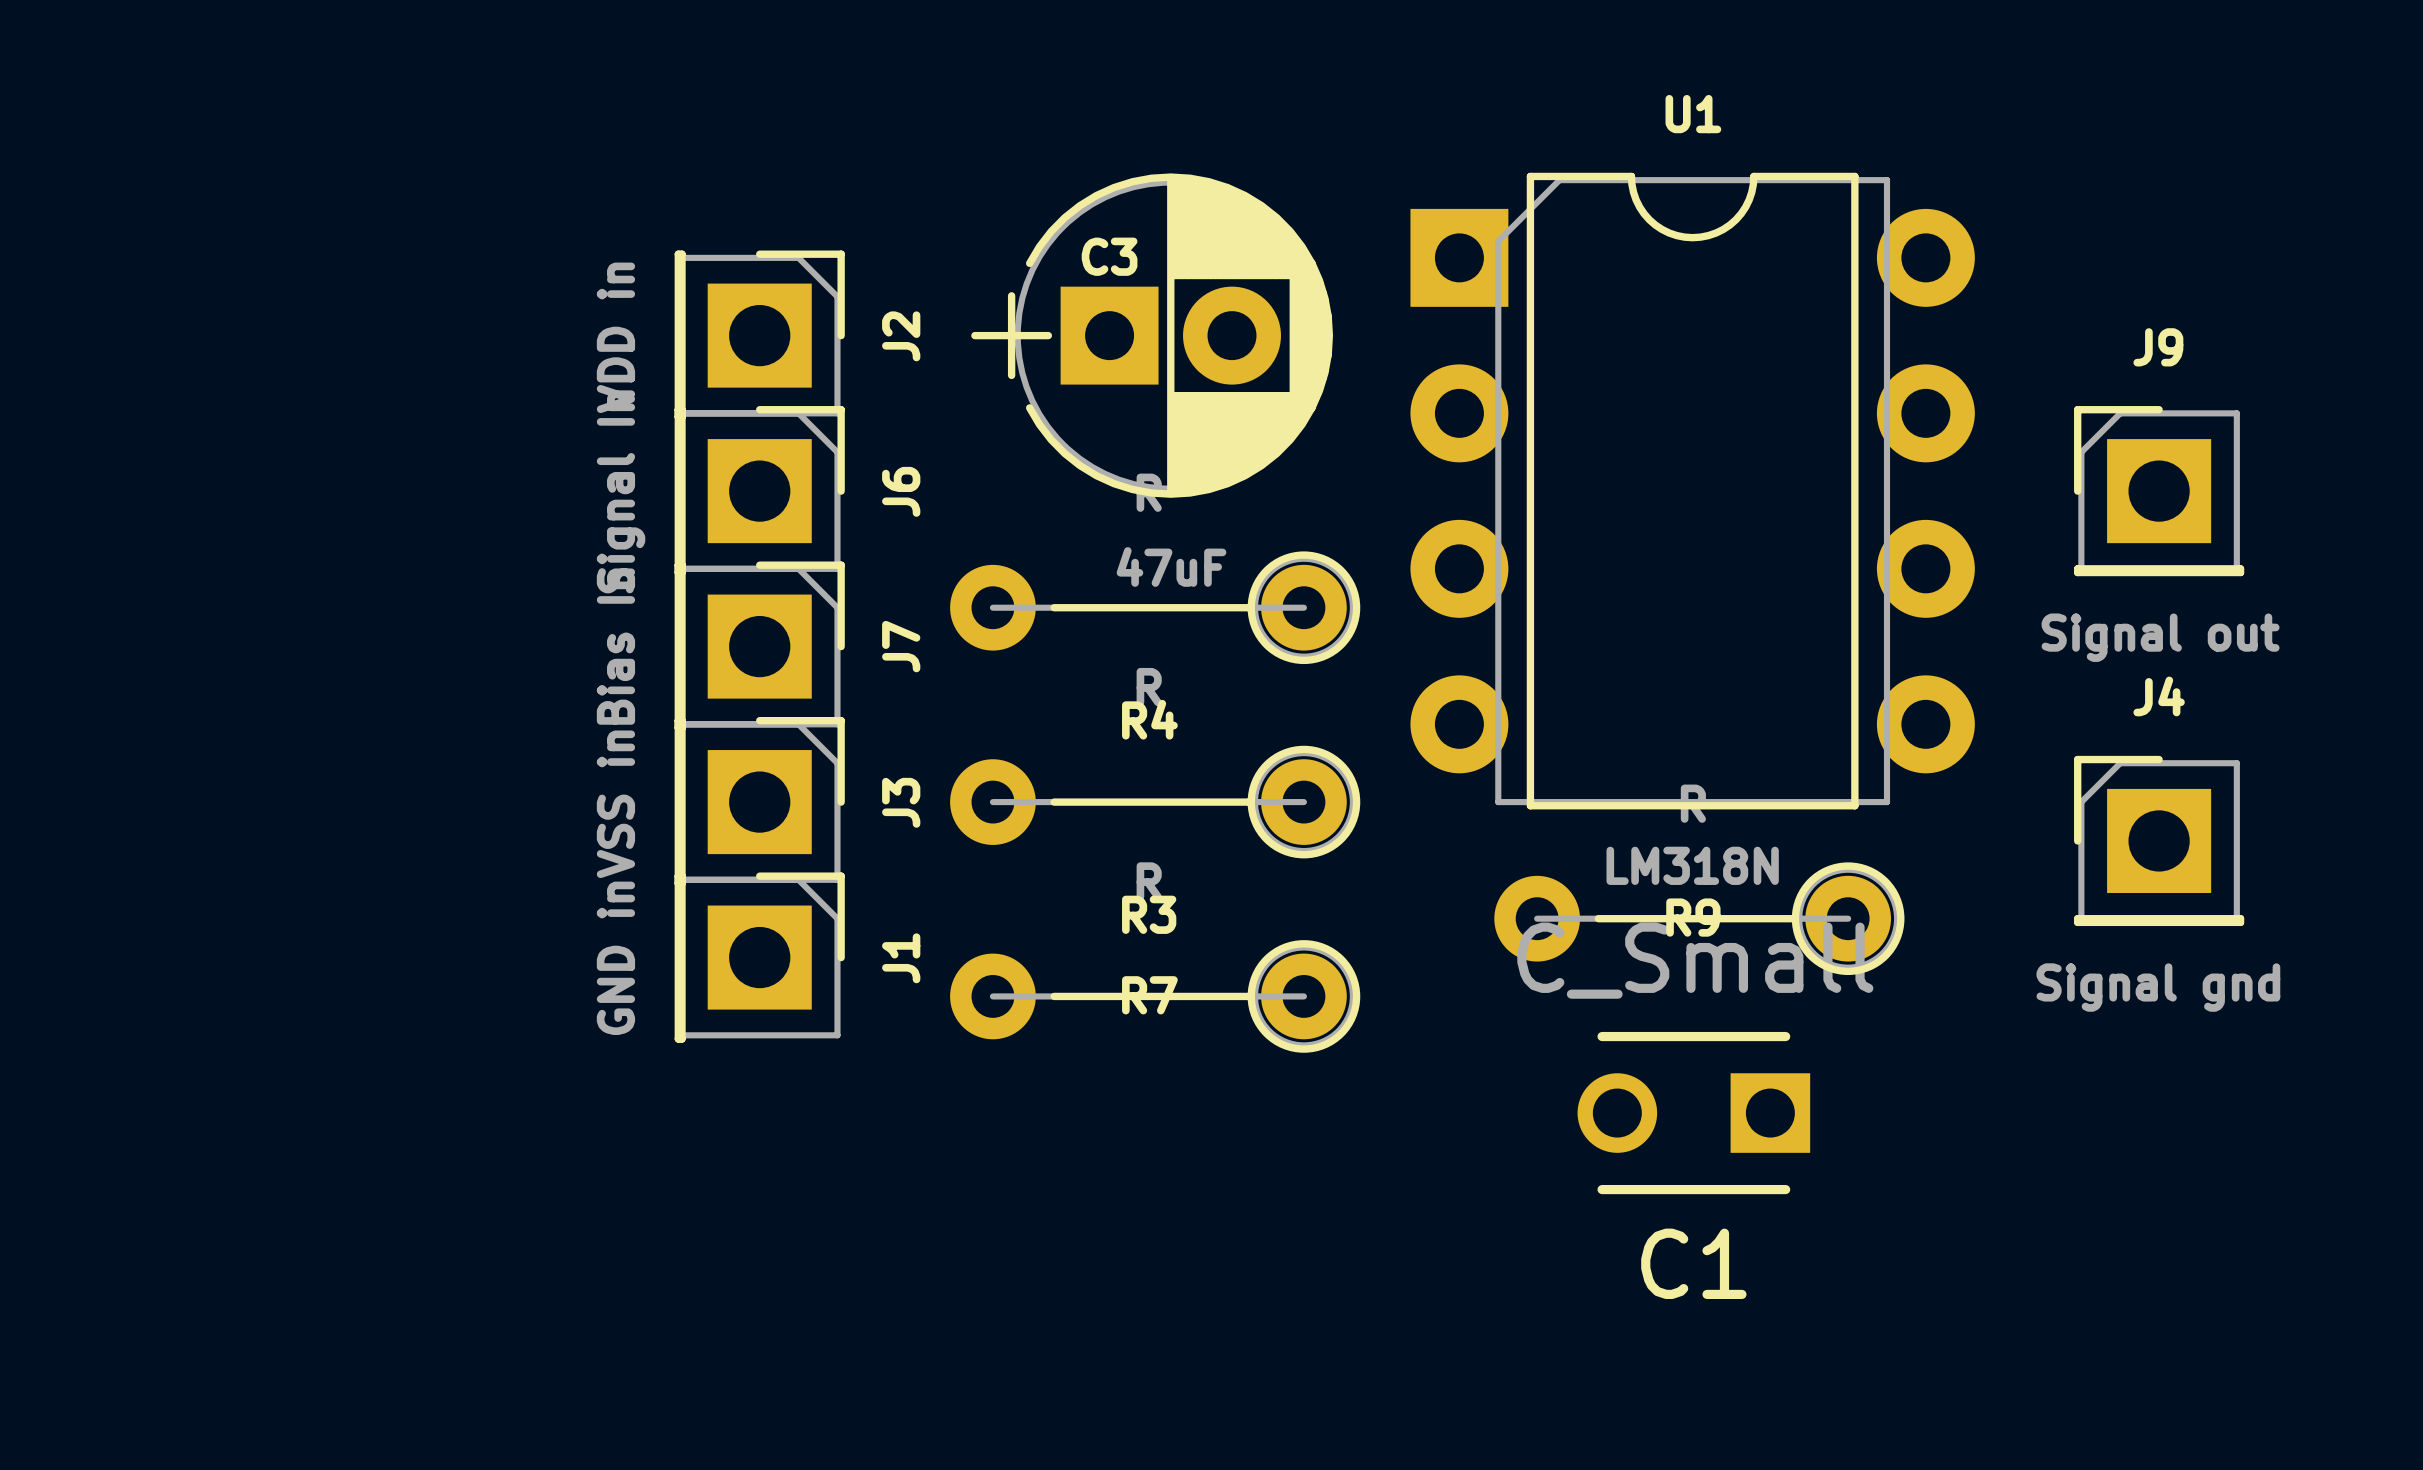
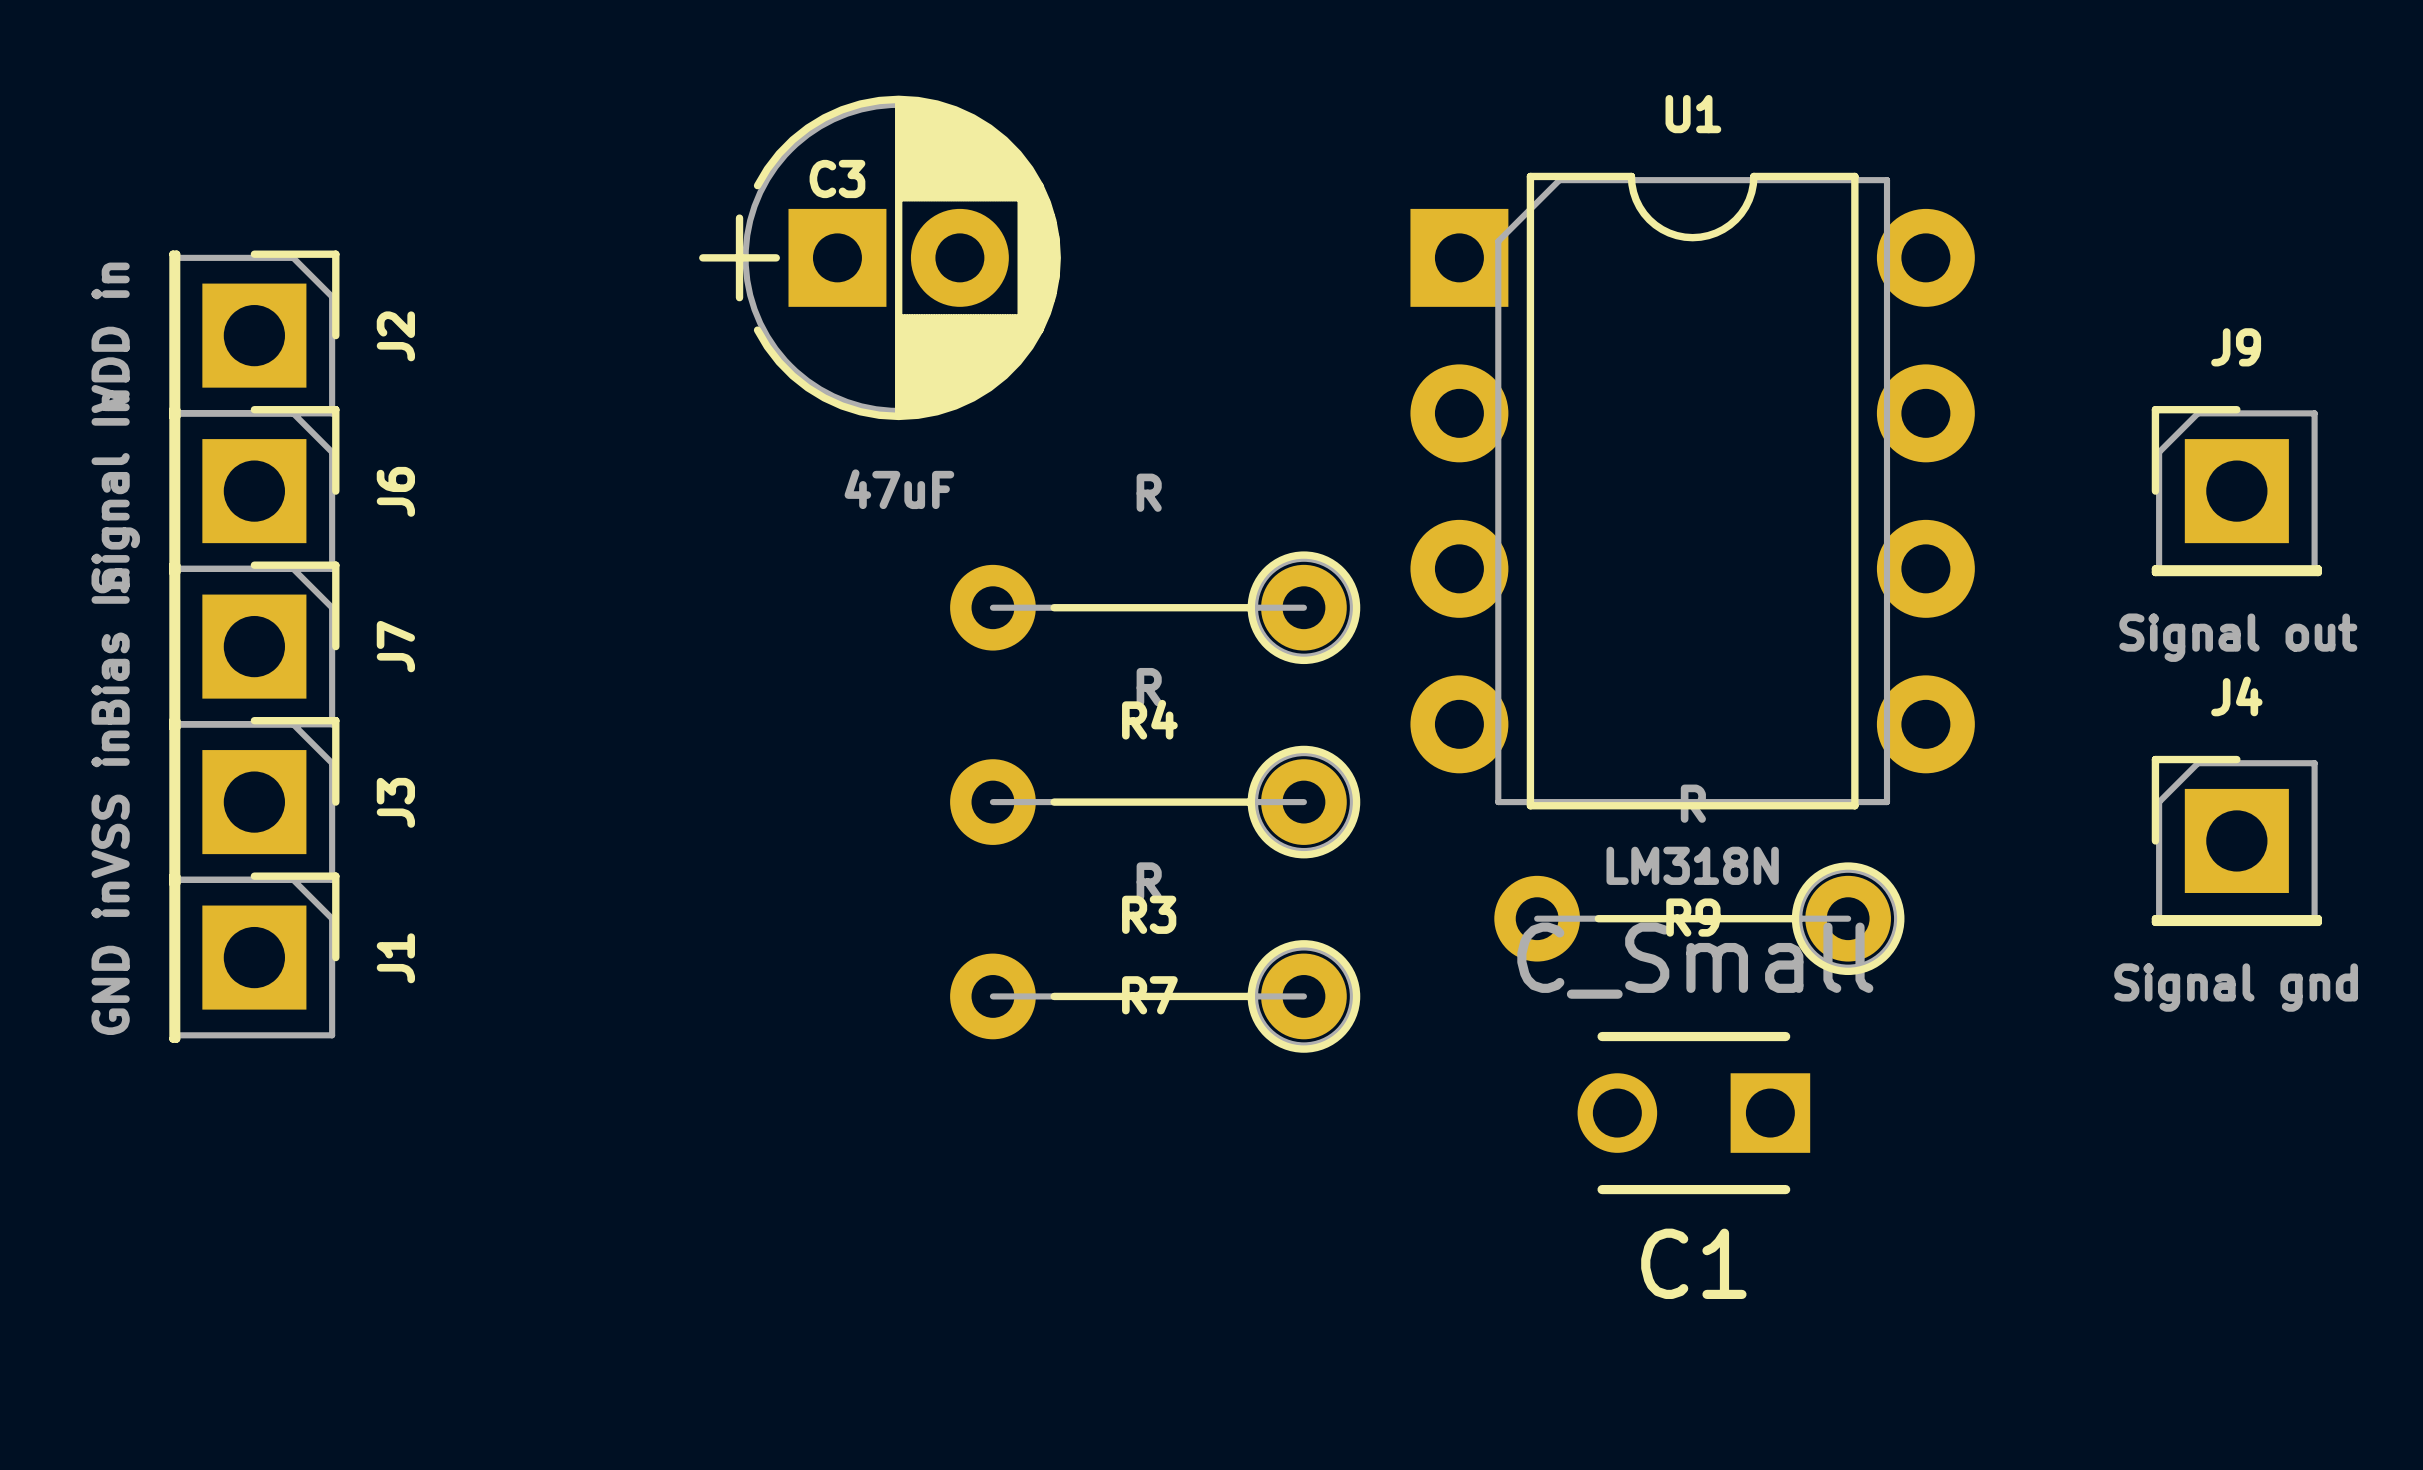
J2 position: (759, 335) -> (254, 335)
C3 position: (1152, 335) -> (880, 257)
J6 position: (759, 491) -> (254, 491)
J9 position: (2159, 491) -> (2236, 491)
J7 position: (759, 646) -> (254, 646)
J3 position: (759, 802) -> (254, 802)
J4 position: (2159, 840) -> (2236, 840)
J1 position: (759, 957) -> (254, 957)

